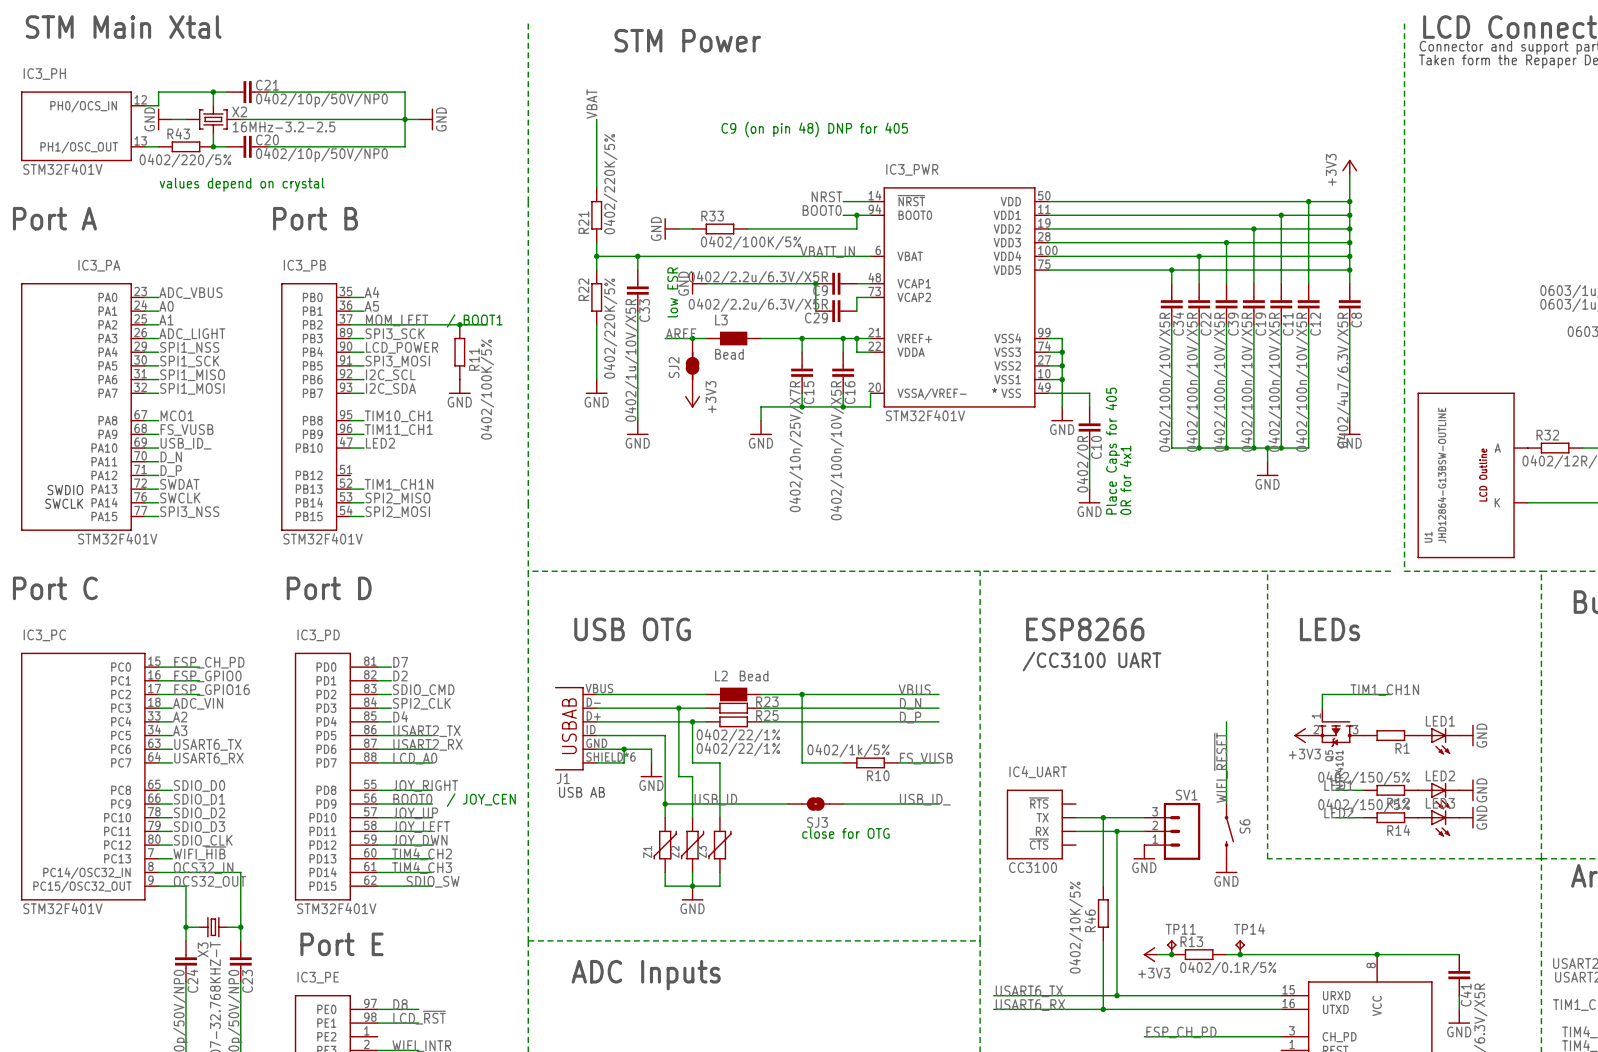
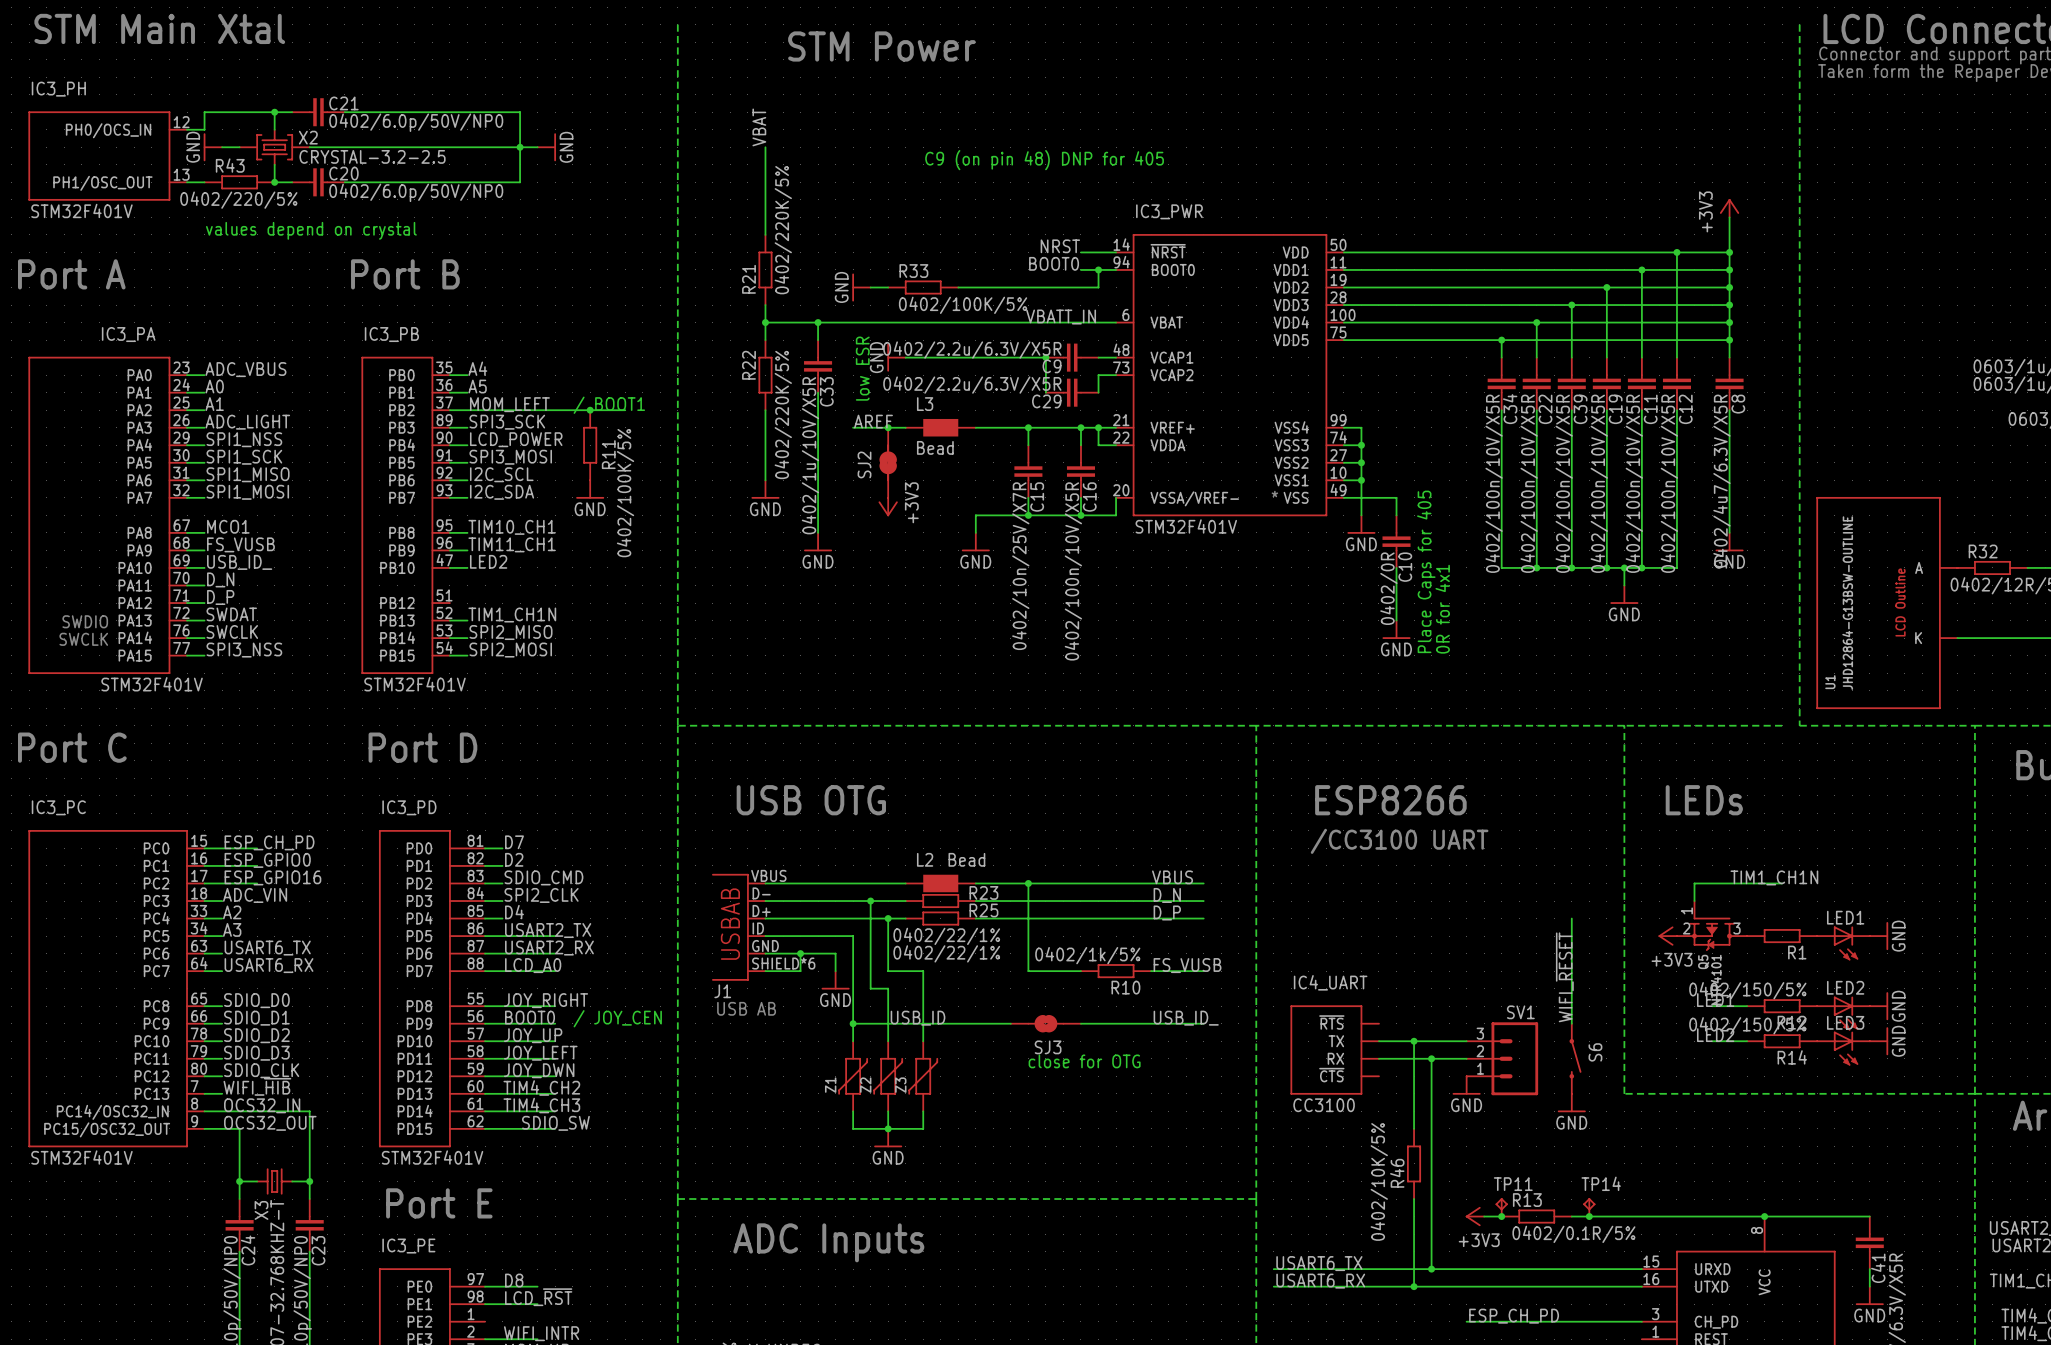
C21 value: 0402/10p/50V/NP0 (321, 100) -> 0402/6.0p/50V/NP0 (416, 122)
X2 value: 16MHz-3.2-2.5 (284, 126) -> CRYSTAL-3.2-2.5 (372, 156)
C20 value: 0402/10p/50V/NP0 (321, 155) -> 0402/6.0p/50V/NP0 (416, 192)

